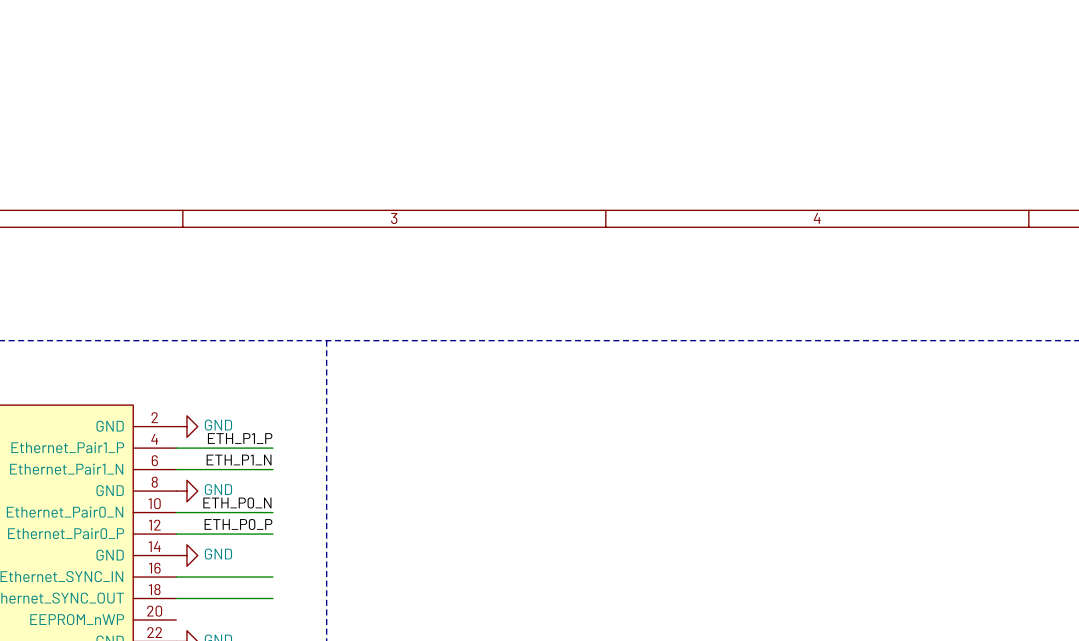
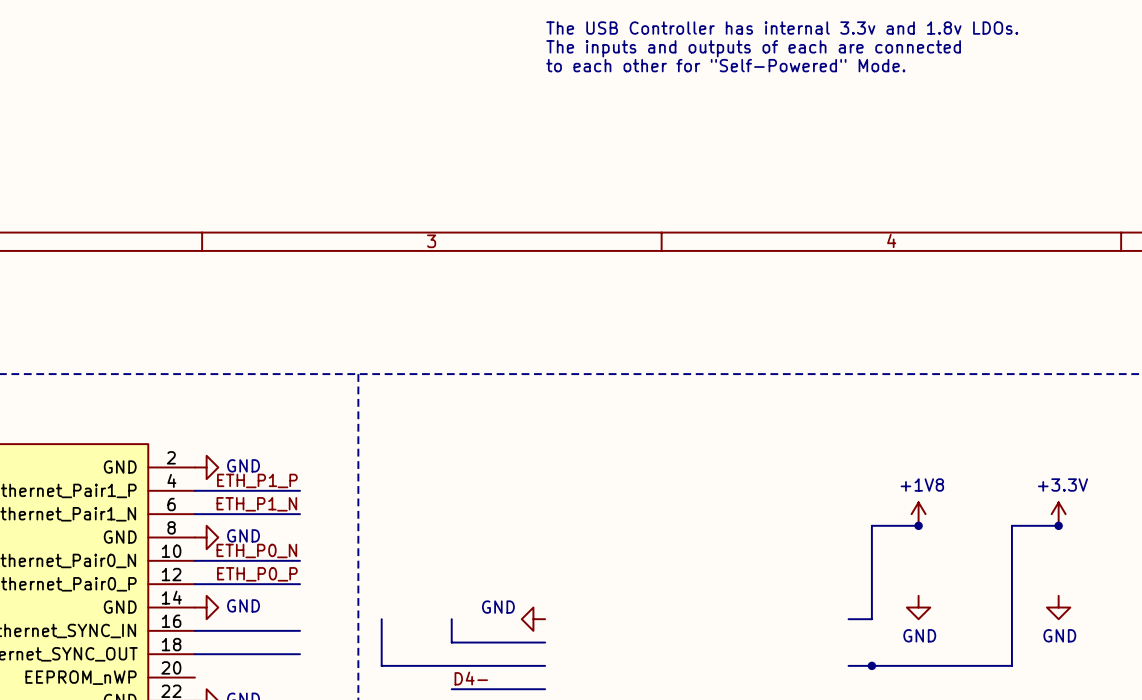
text: none -> The USB Controller has internal 3.3v and 1.8v LDOs. (782, 28)
text: none -> The inputs and outputs of each are connected (753, 48)
text: none -> to each other for "Self-Powered" Mode. (725, 65)
power symbol: none -> +1V8 (918, 514)
power symbol: none -> +3.3V (1058, 514)
wire: none -> (918, 525) (871, 525) (871, 619) (848, 619)
junction: none -> (918, 525)
wire: none -> (1058, 525) (1011, 525) (1011, 665) (848, 665)
junction: none -> (1058, 525)
power symbol: none -> GND (918, 607)
power symbol: none -> GND (1058, 607)
wire: none -> (381, 619) (381, 665) (545, 665)
wire: none -> (451, 619) (451, 642) (545, 642)
power symbol: none -> GND (533, 619)
junction: none -> (871, 665)
label: none -> D4- (471, 678)
wire: none -> (451, 689) (545, 689)

